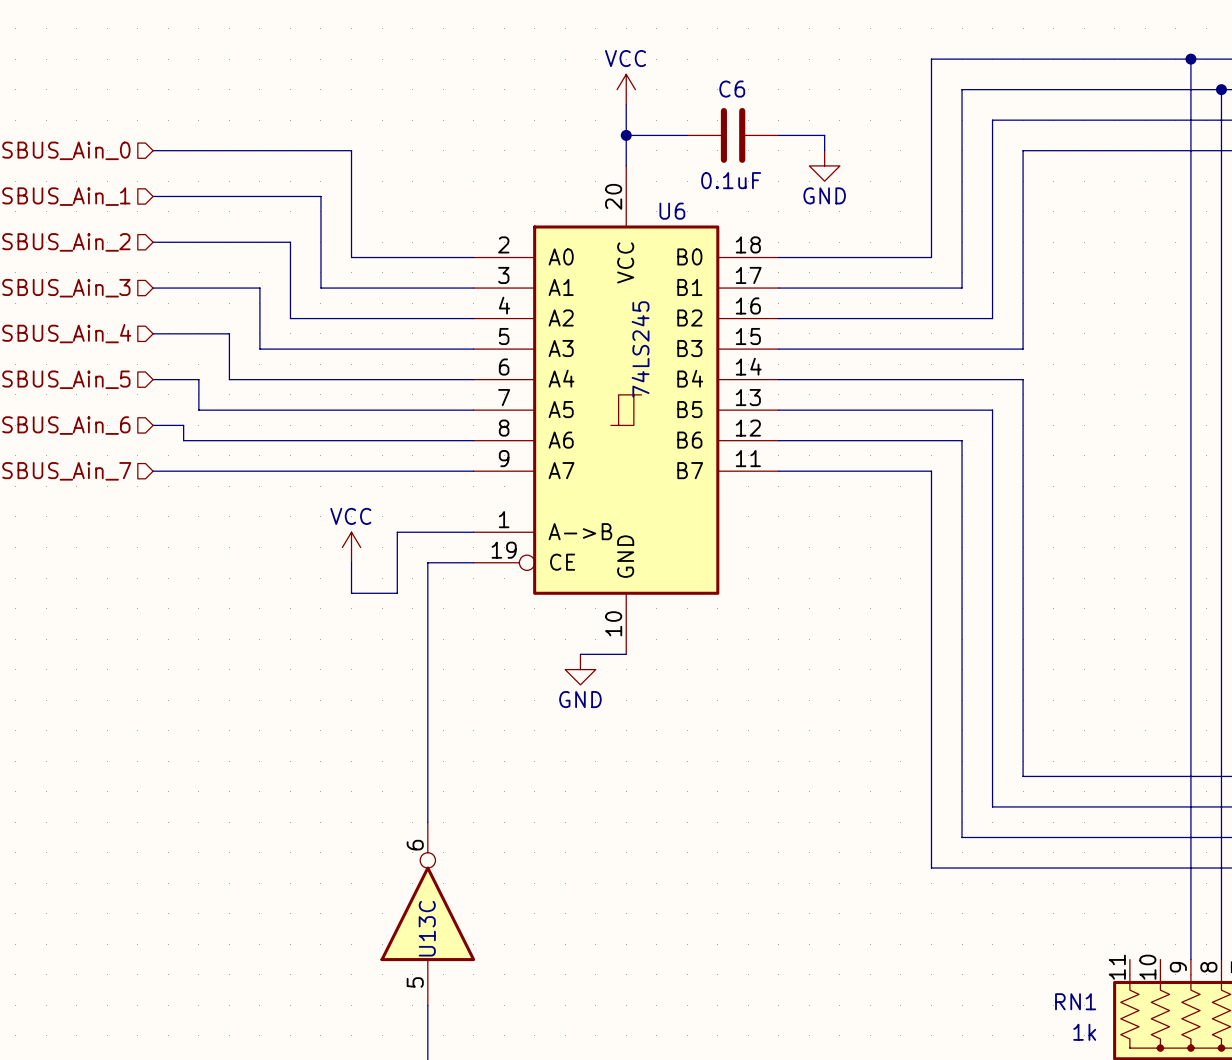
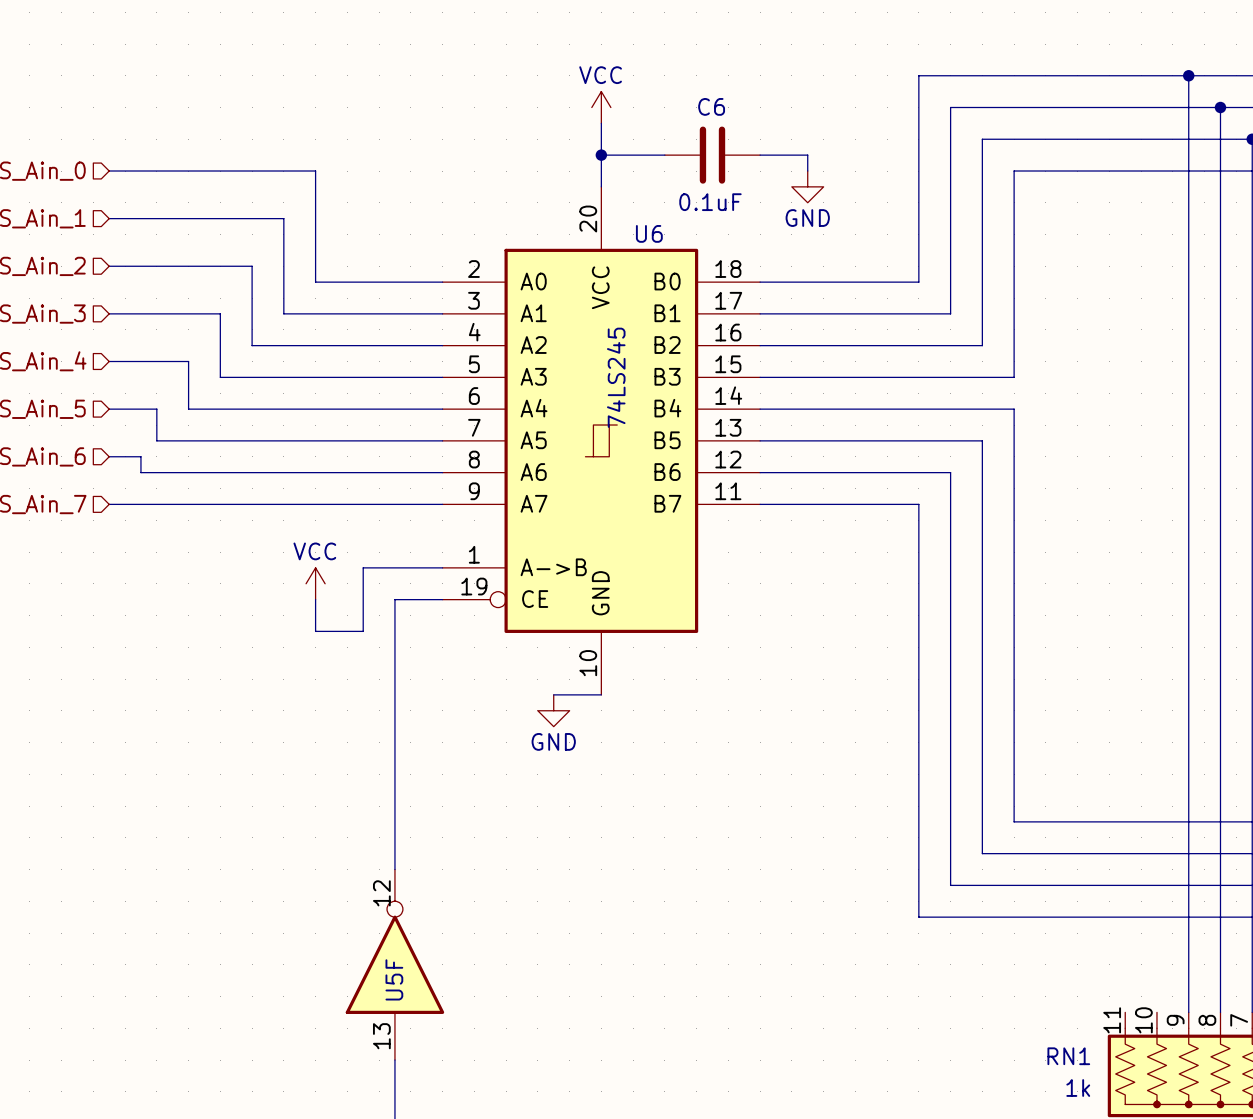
U13C pin number: 6 (415, 845) -> 12 (381, 893)
U13C name: U13C (427, 928) -> U5F (394, 979)
U13C pin number: 5 (415, 982) -> 13 (381, 1036)

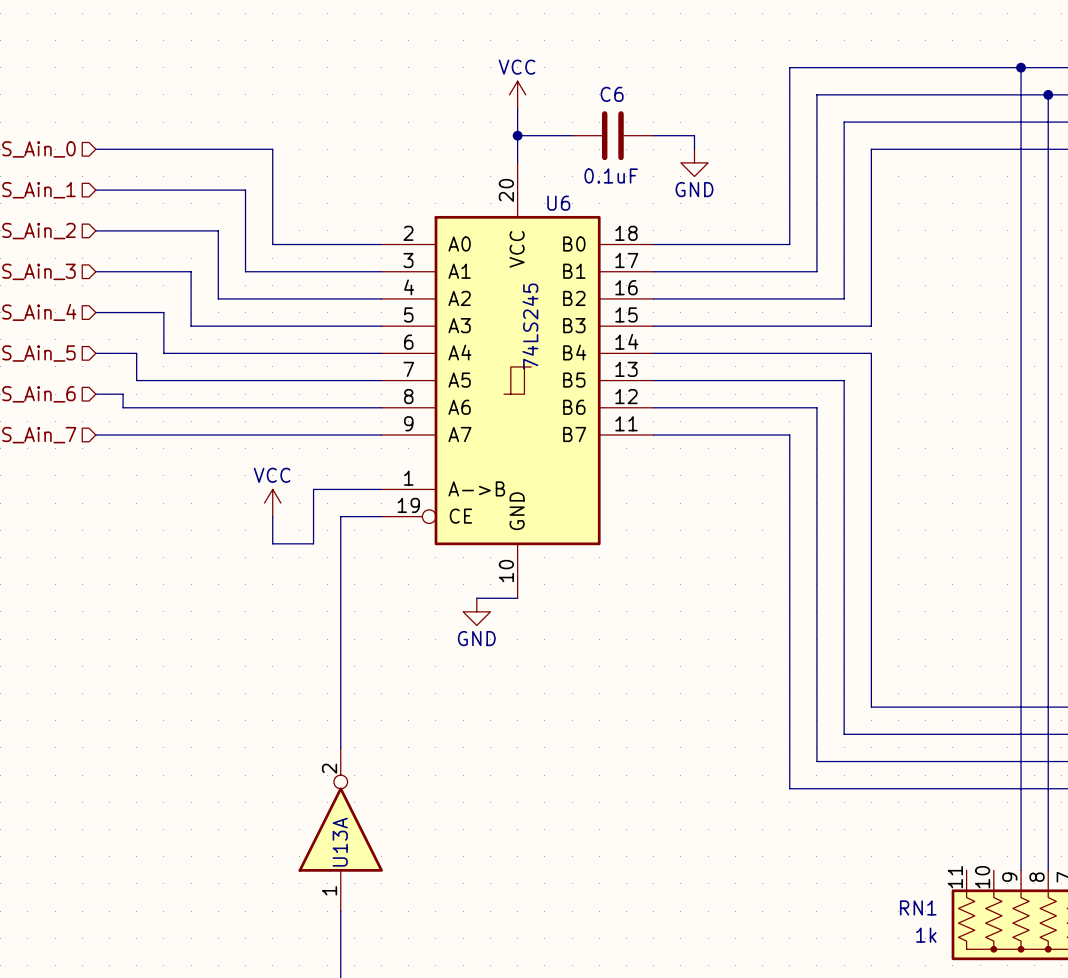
U5F pin number: 12 (381, 893) -> 2 (329, 768)
U5F name: U5F (394, 979) -> U13A (340, 842)
U5F pin number: 13 (381, 1036) -> 1 (329, 890)

